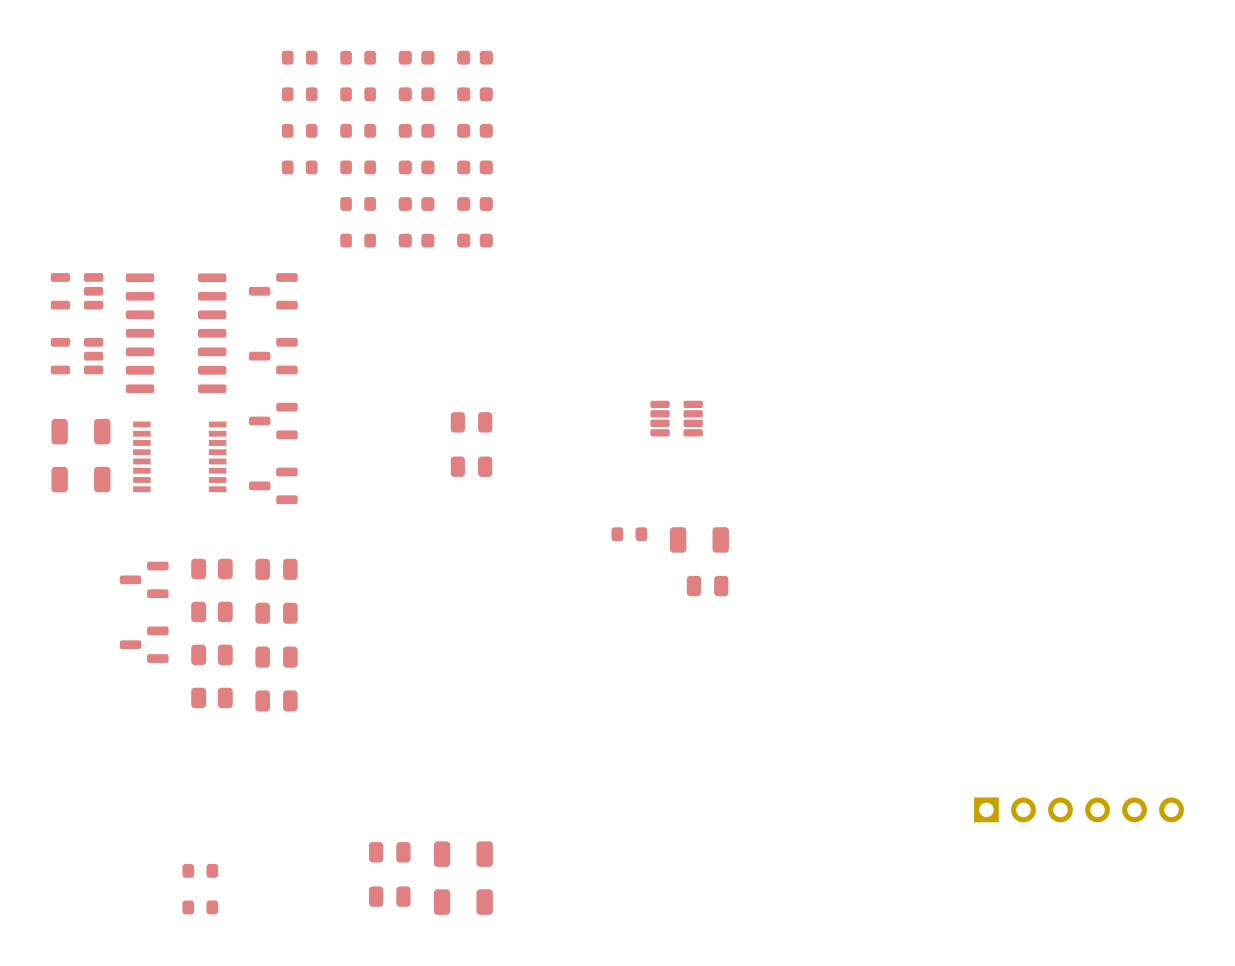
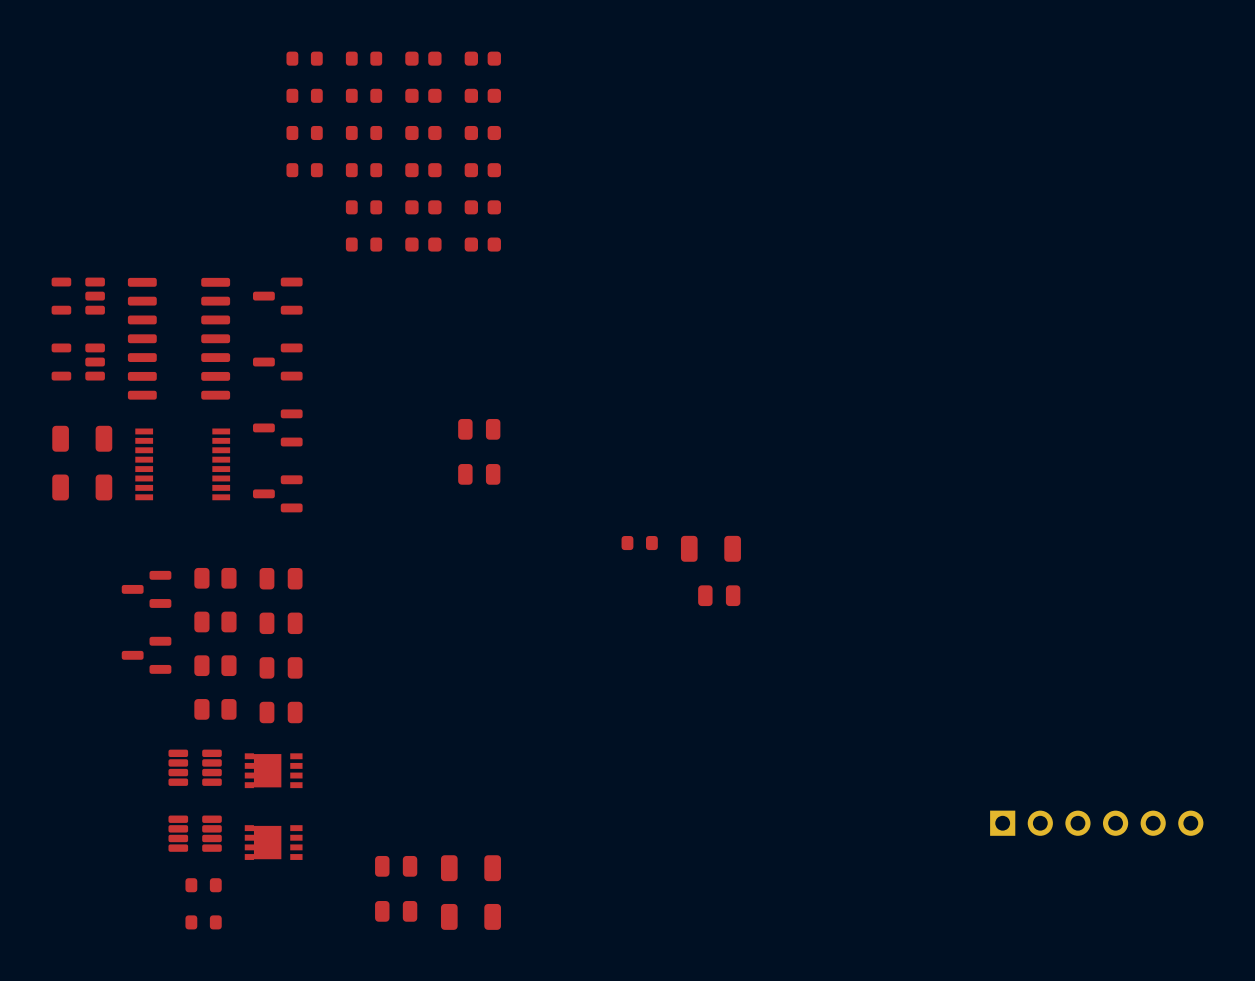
part: (676, 418) -> none
part: none -> (195, 767)
part: none -> (273, 770)
part: none -> (195, 833)
part: none -> (273, 842)

